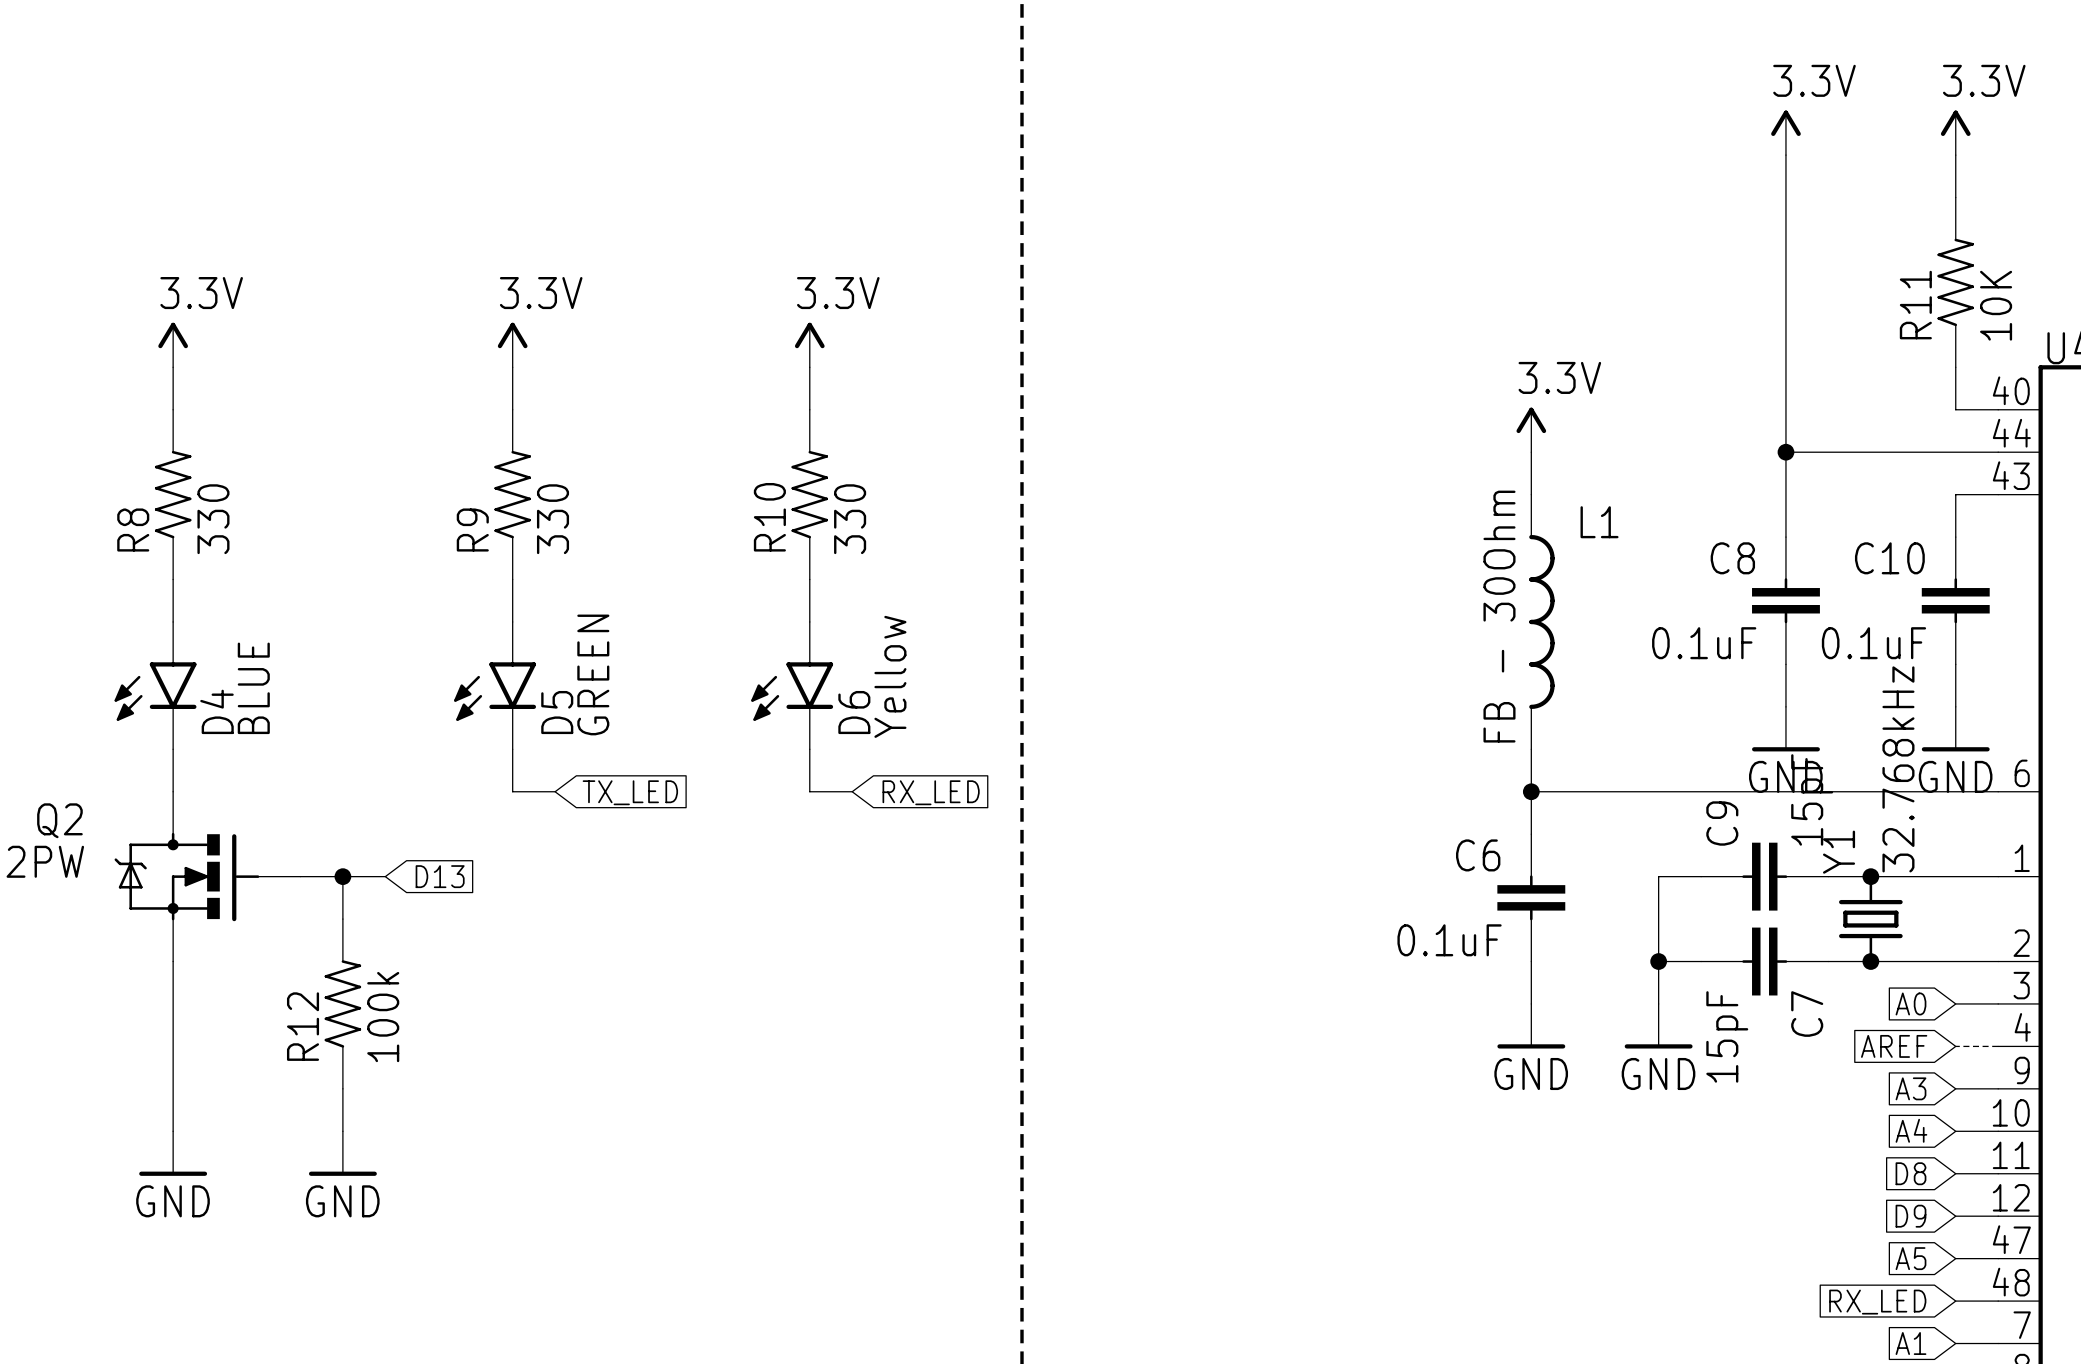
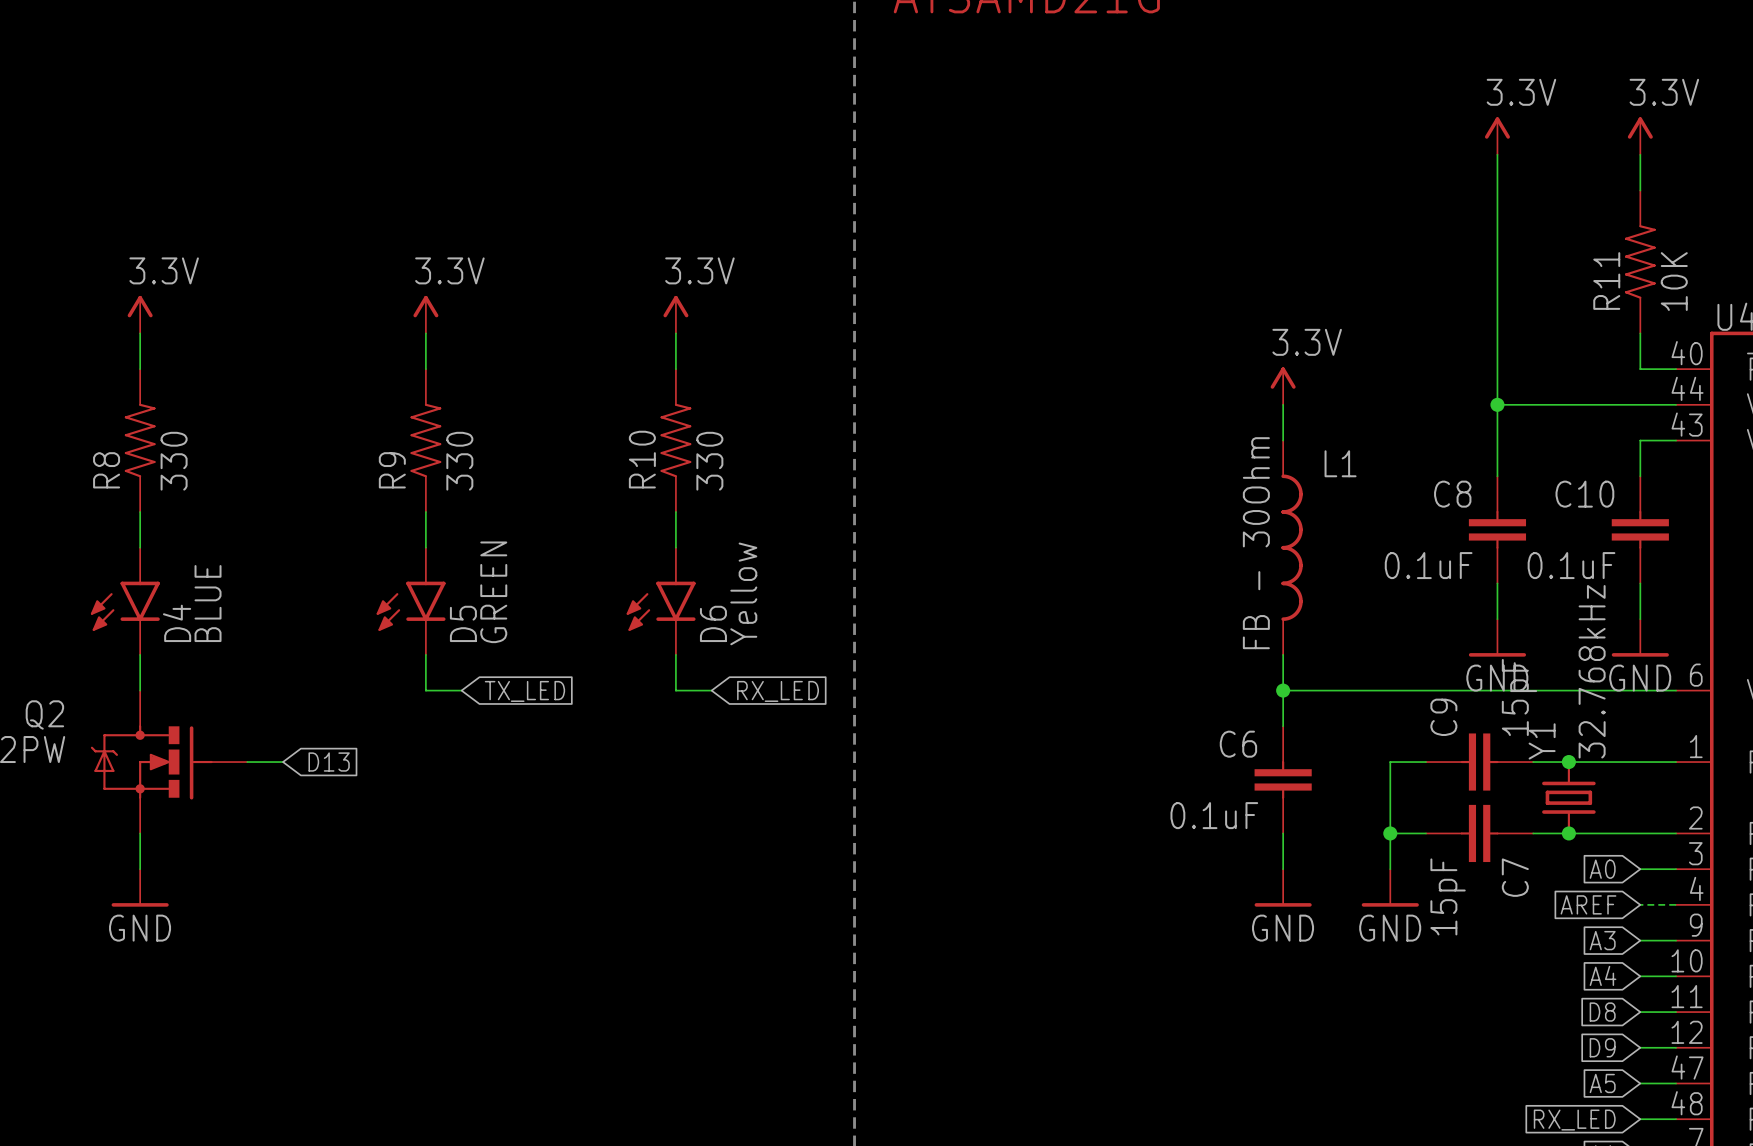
junction: (342, 876) -> none
wire: (385, 876) (342, 876) (342, 919) -> none
global label position: D13 (440, 876) -> D13 (329, 762)
wire: (173, 1003) (173, 1131) -> none
R12: 100k (342, 1003) -> none
power symbol: none -> GND (140, 887)
wire: (342, 1088) (342, 1131) -> none
power symbol: GND (173, 1153) -> none
power symbol: GND (342, 1153) -> none

